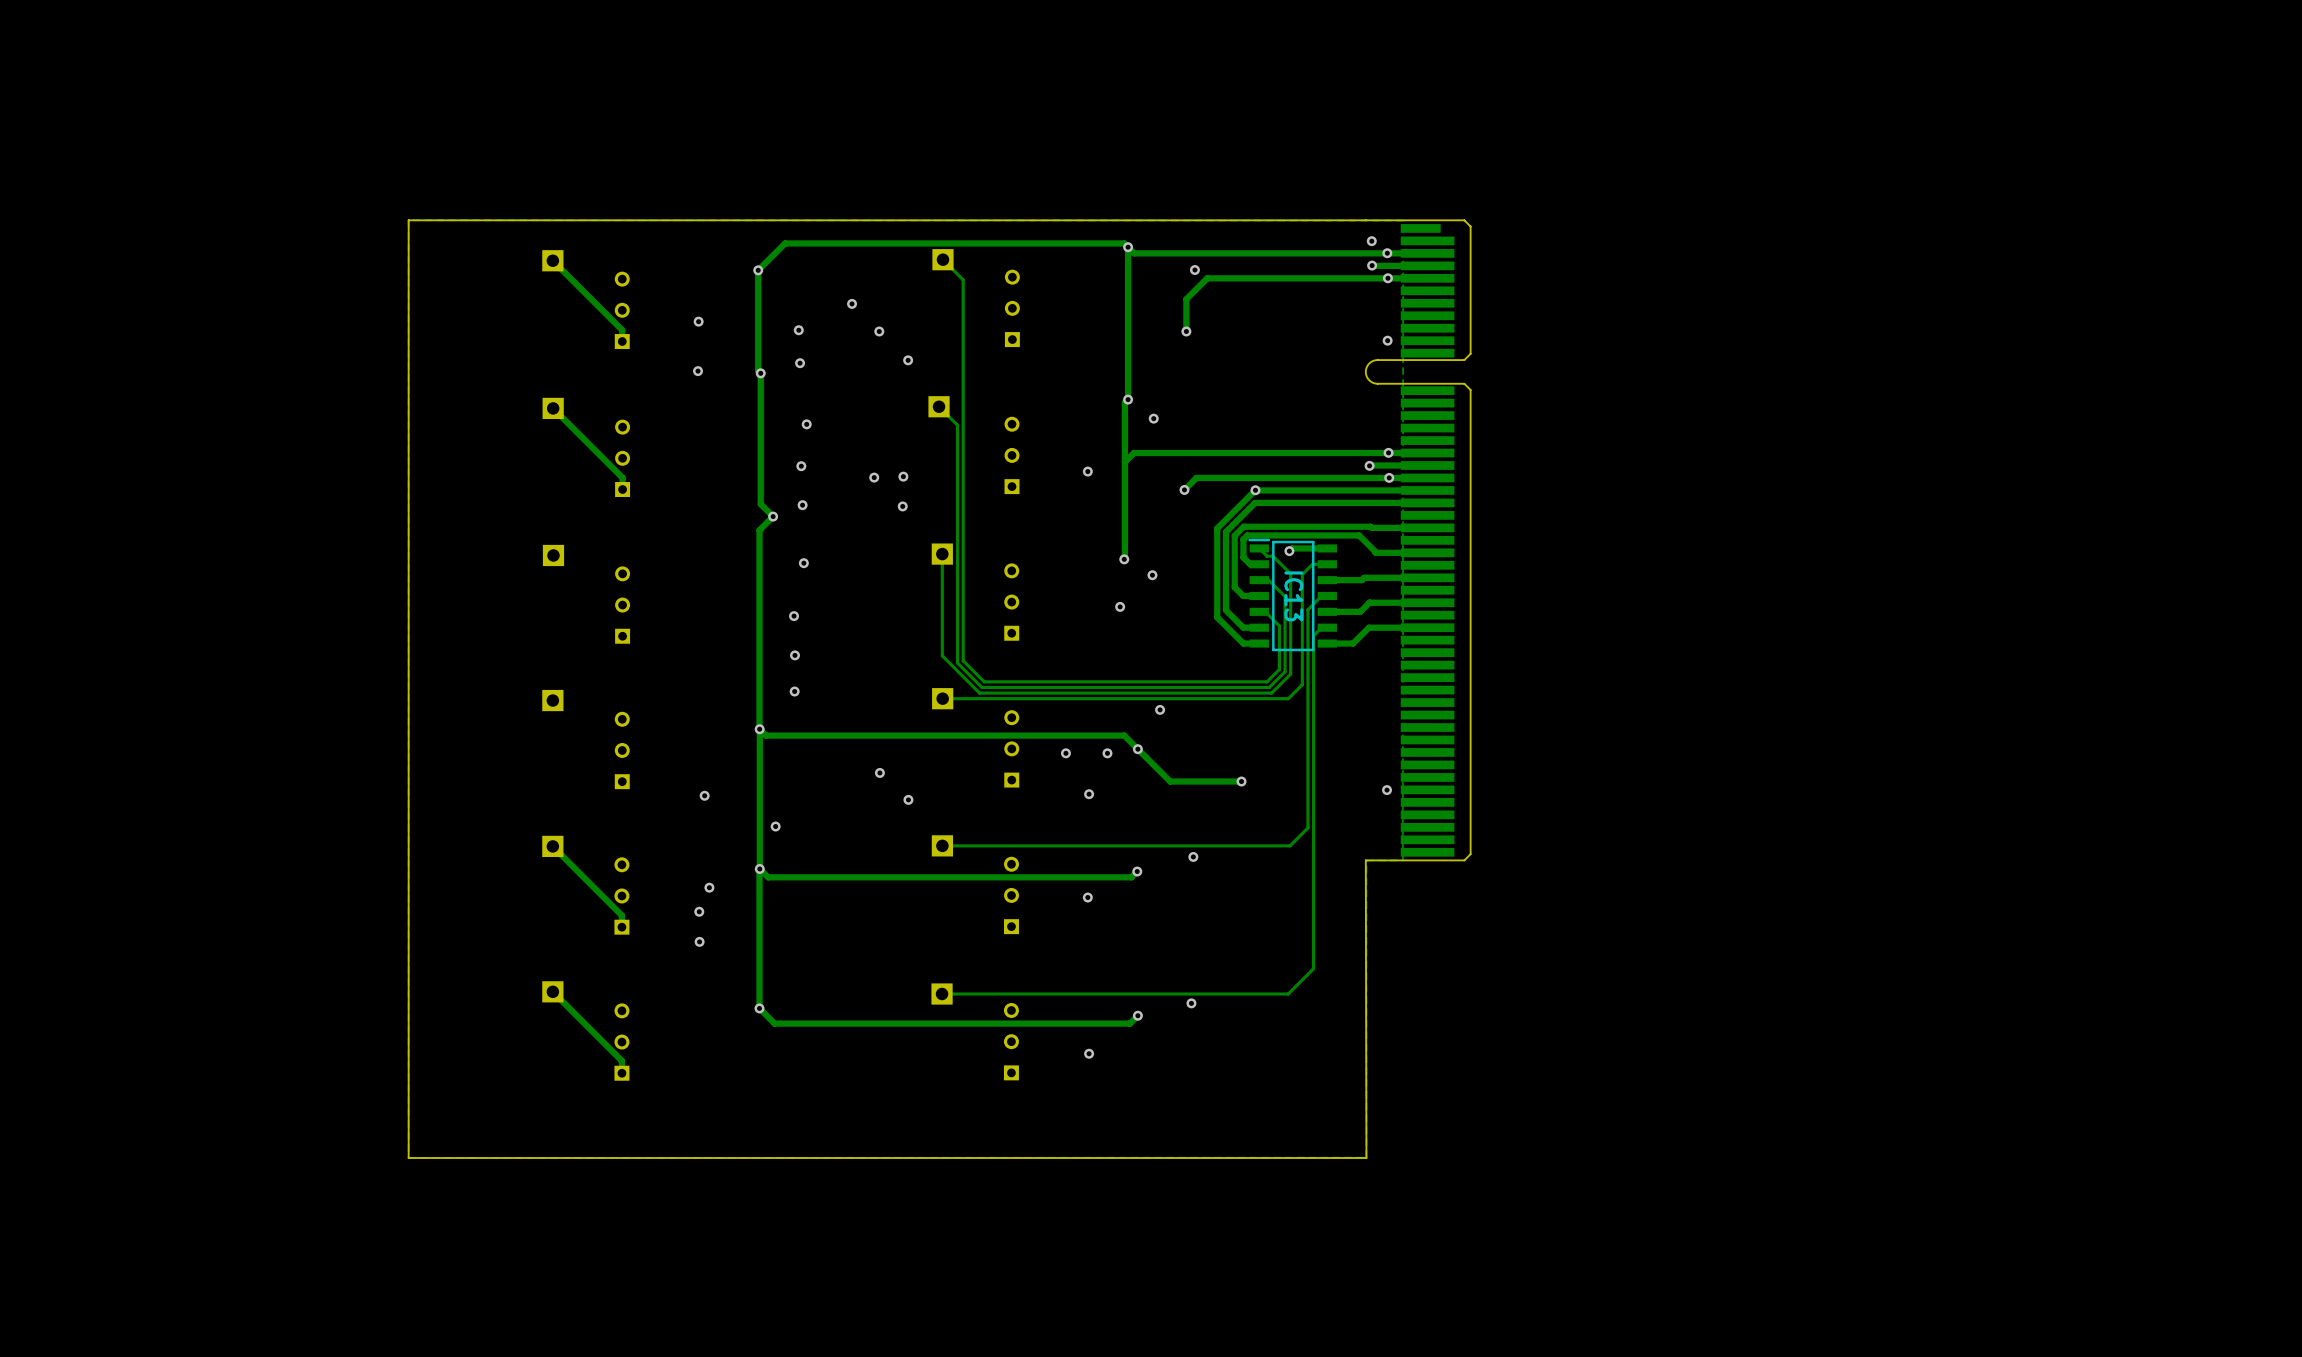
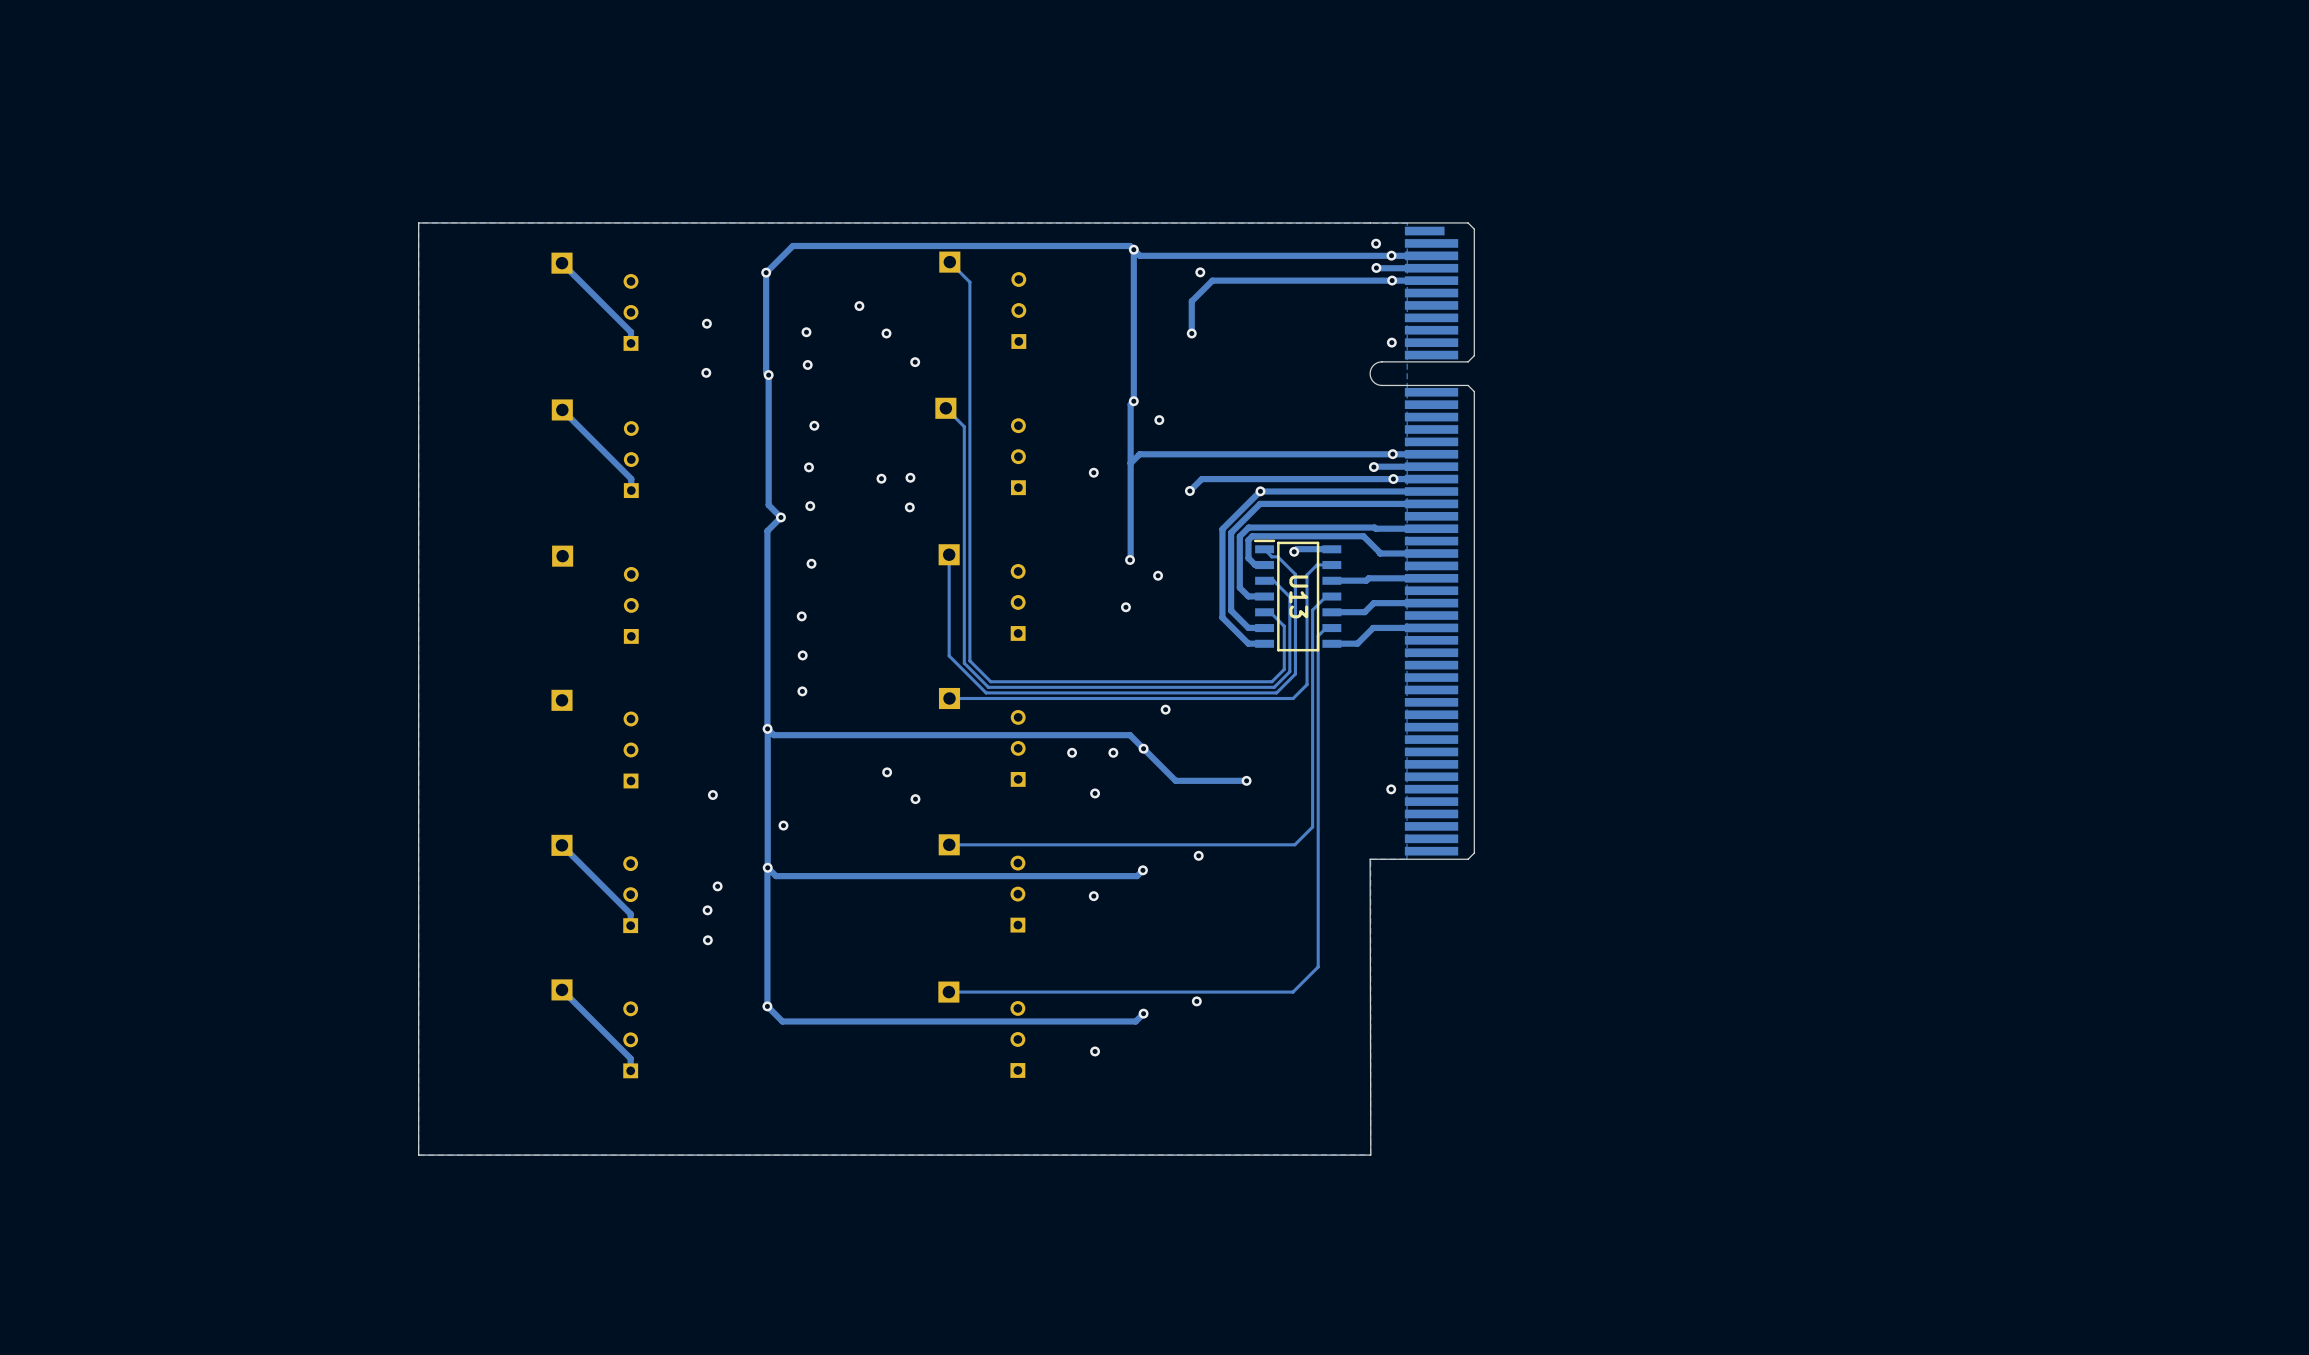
IC13: (1292, 595) -> none
U13: none -> (1297, 595)

